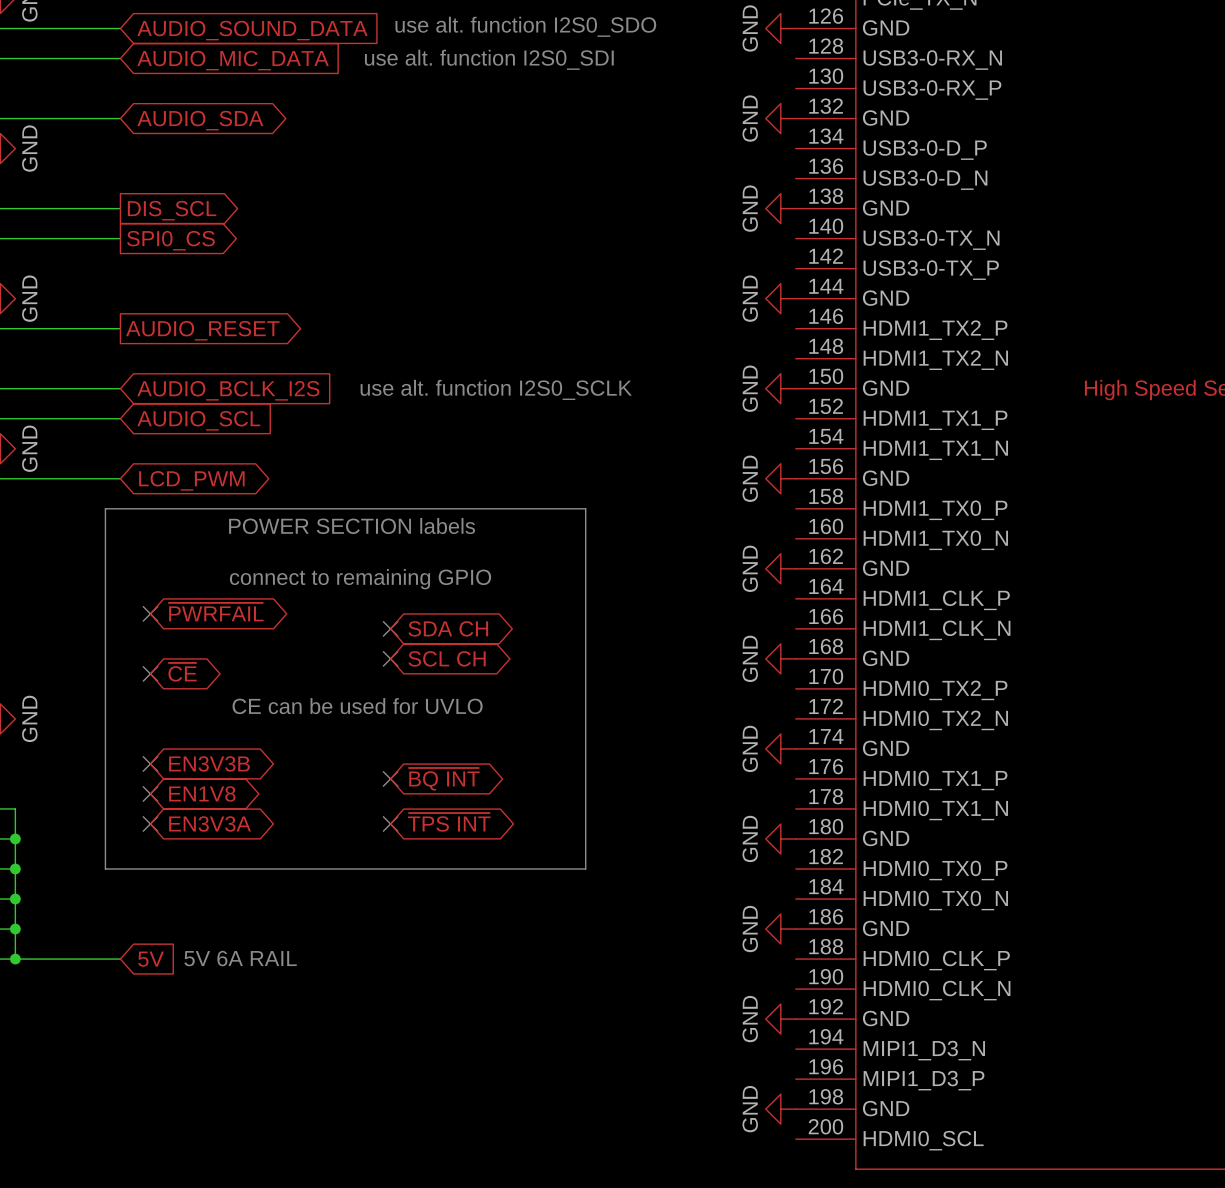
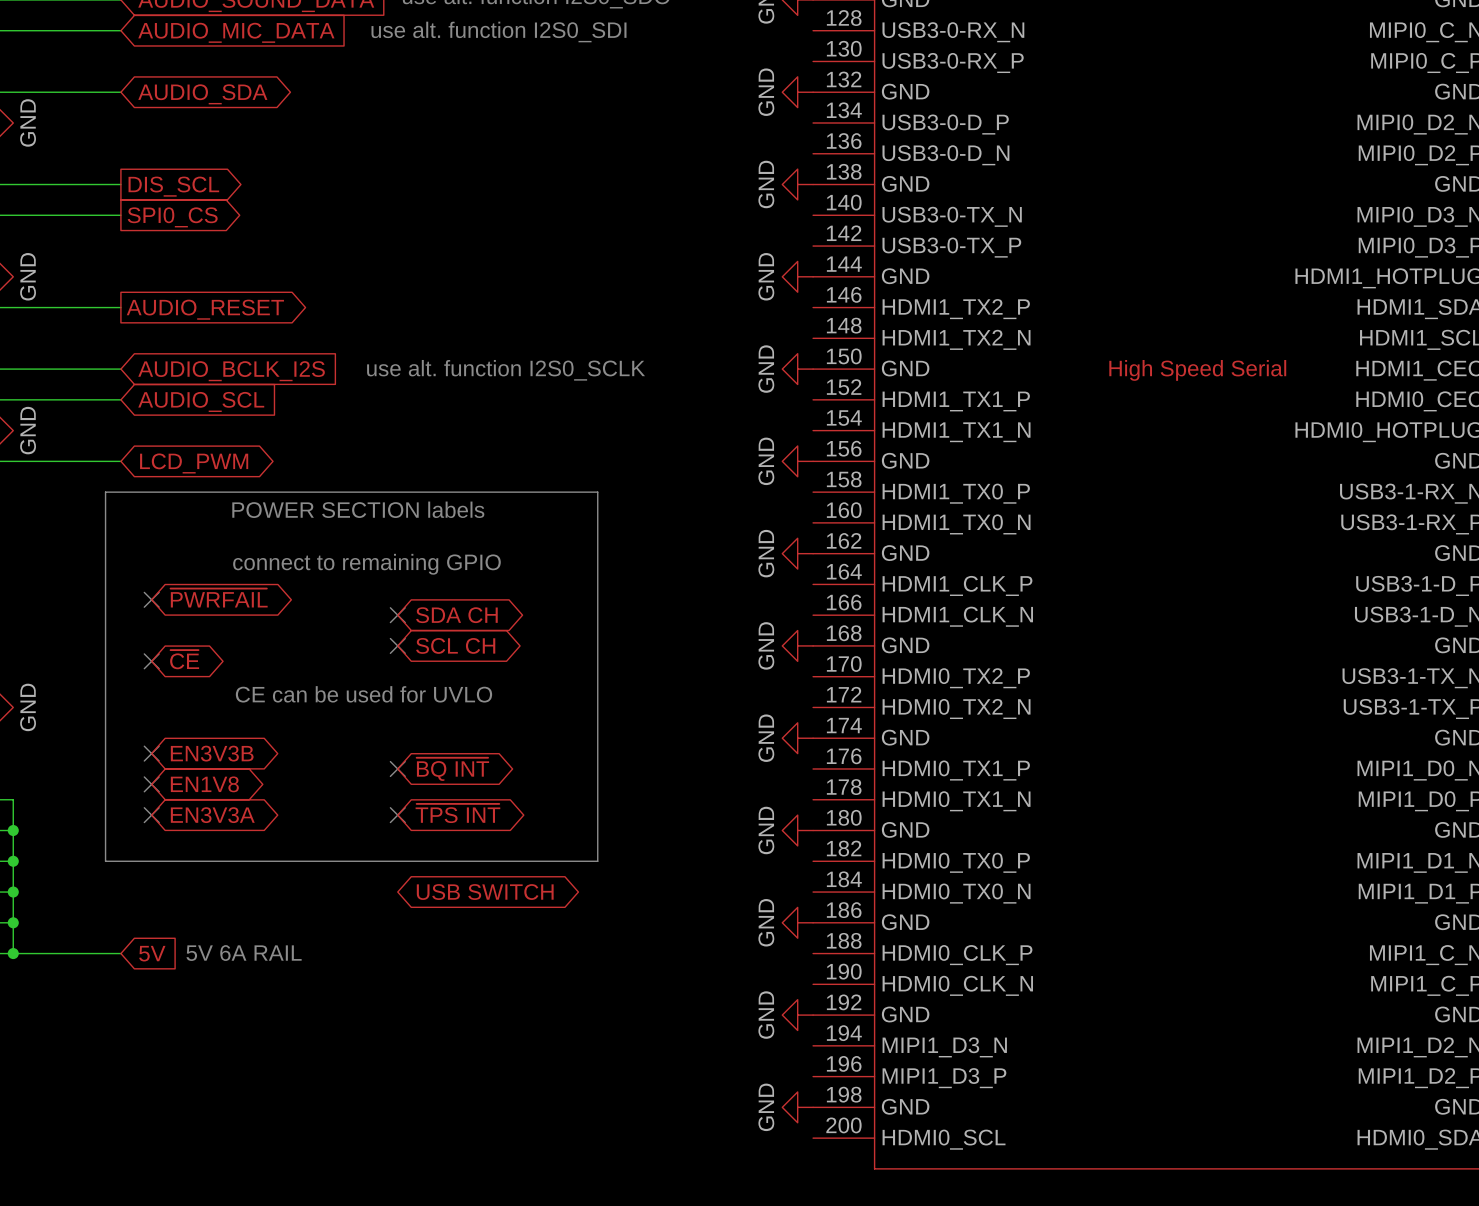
global label: none -> USB SWITCH (485, 892)

